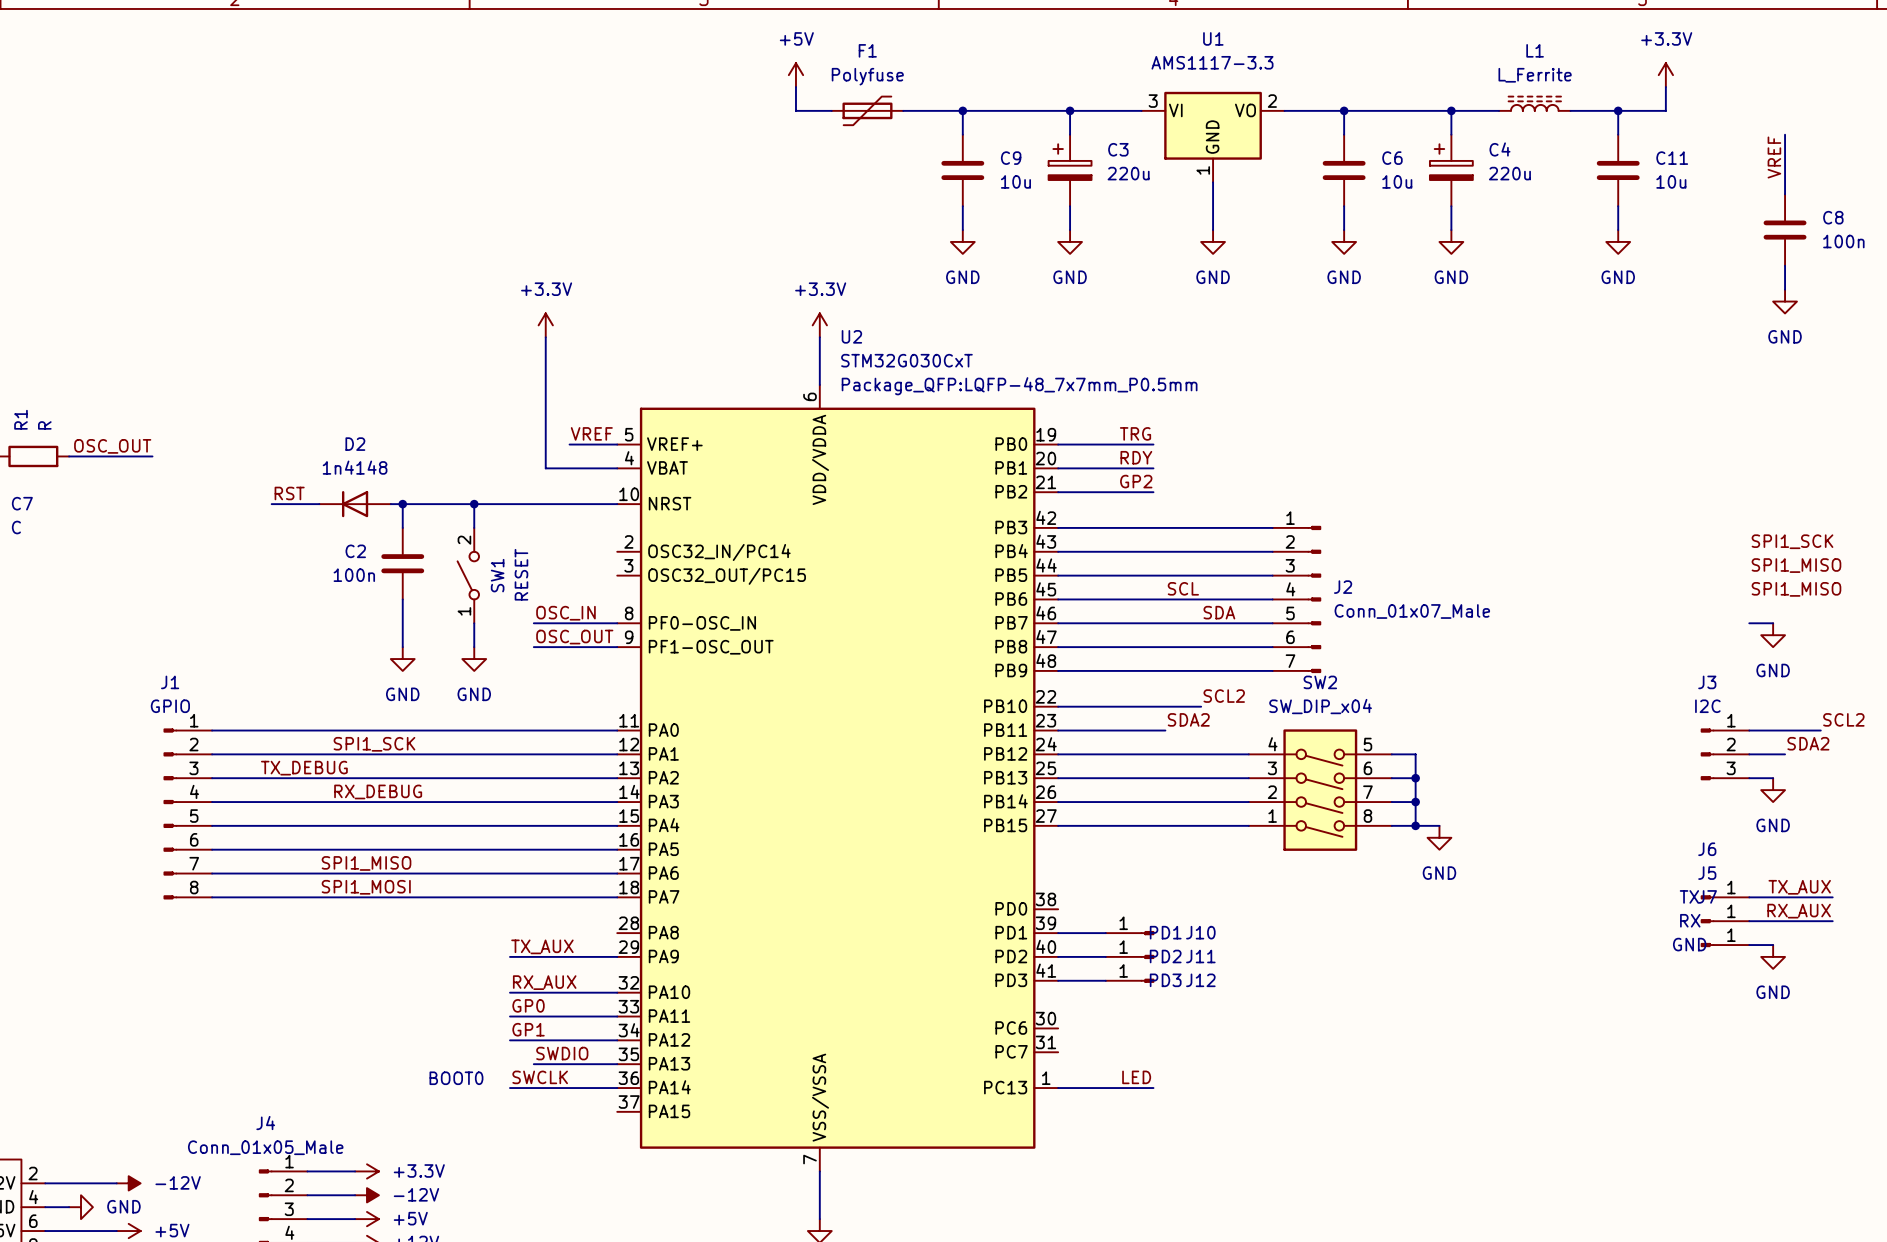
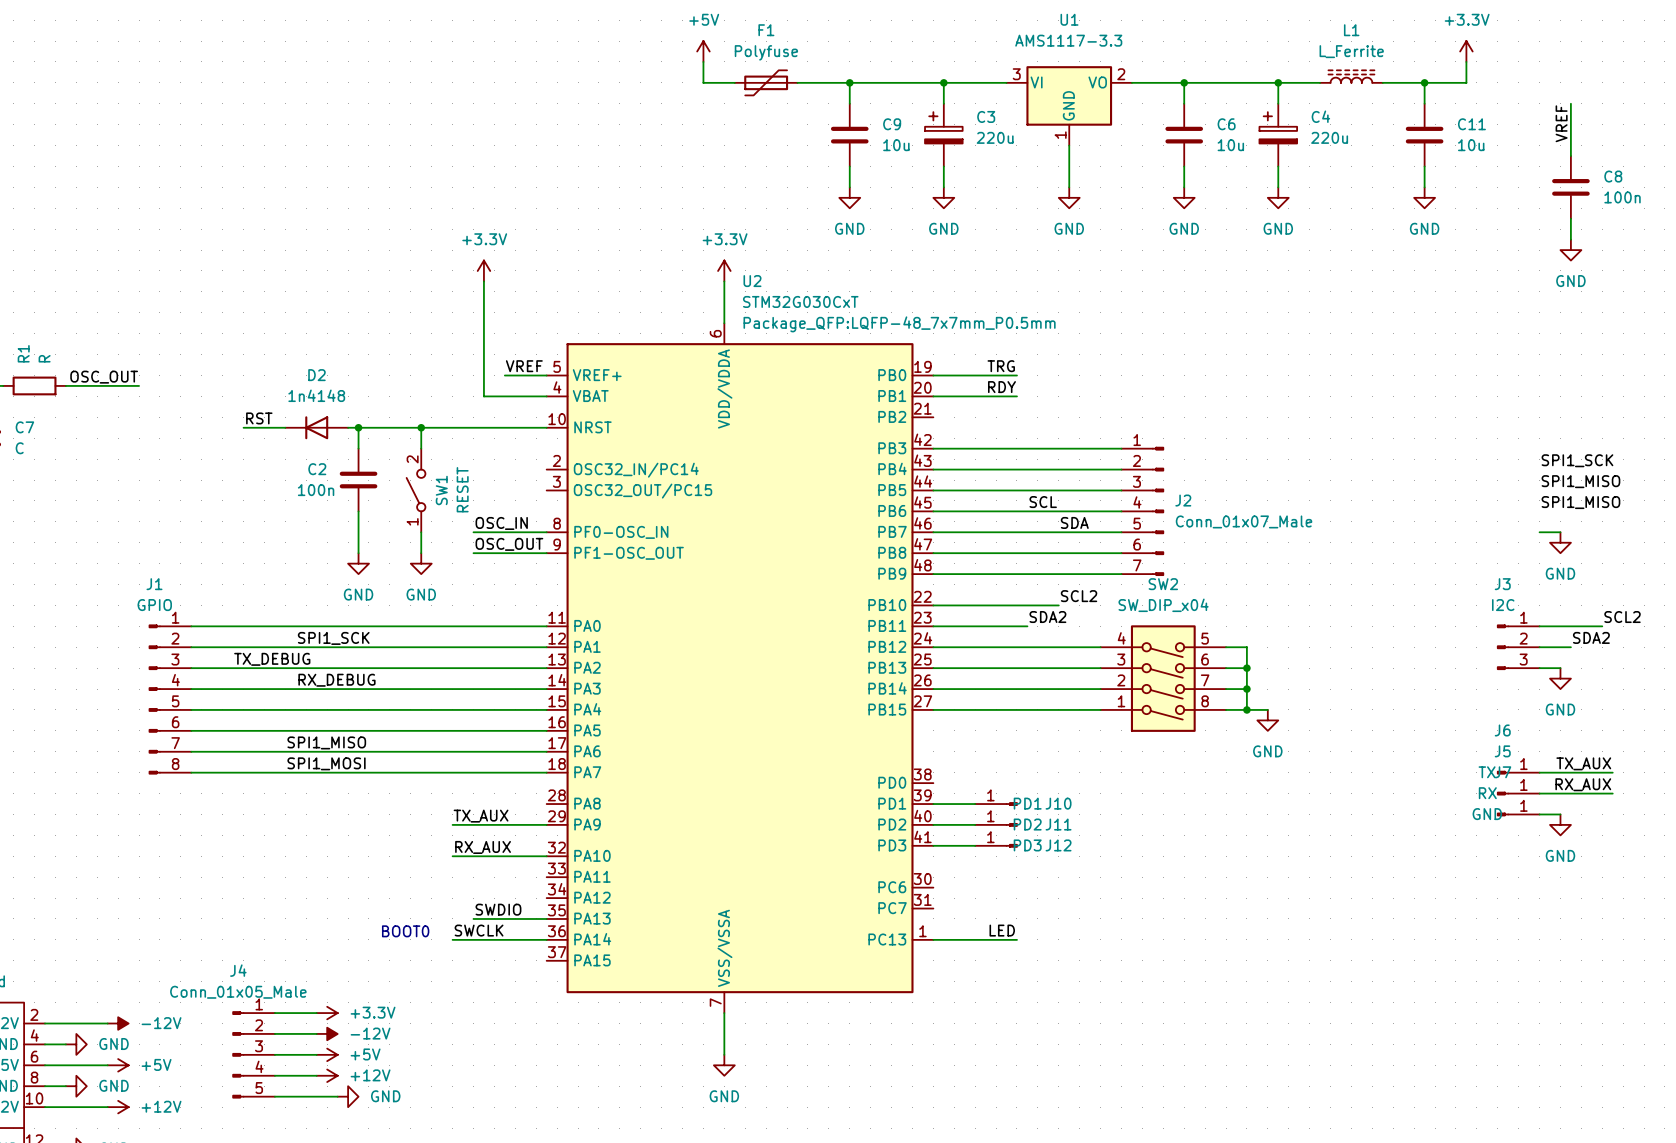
label: GP2 (1136, 481) -> none
wire: (1058, 492) (1153, 492) -> none
label: GP0 (528, 1005) -> none
wire: (509, 1016) (617, 1016) -> none
label: GP1 (528, 1029) -> none
wire: (509, 1040) (617, 1040) -> none

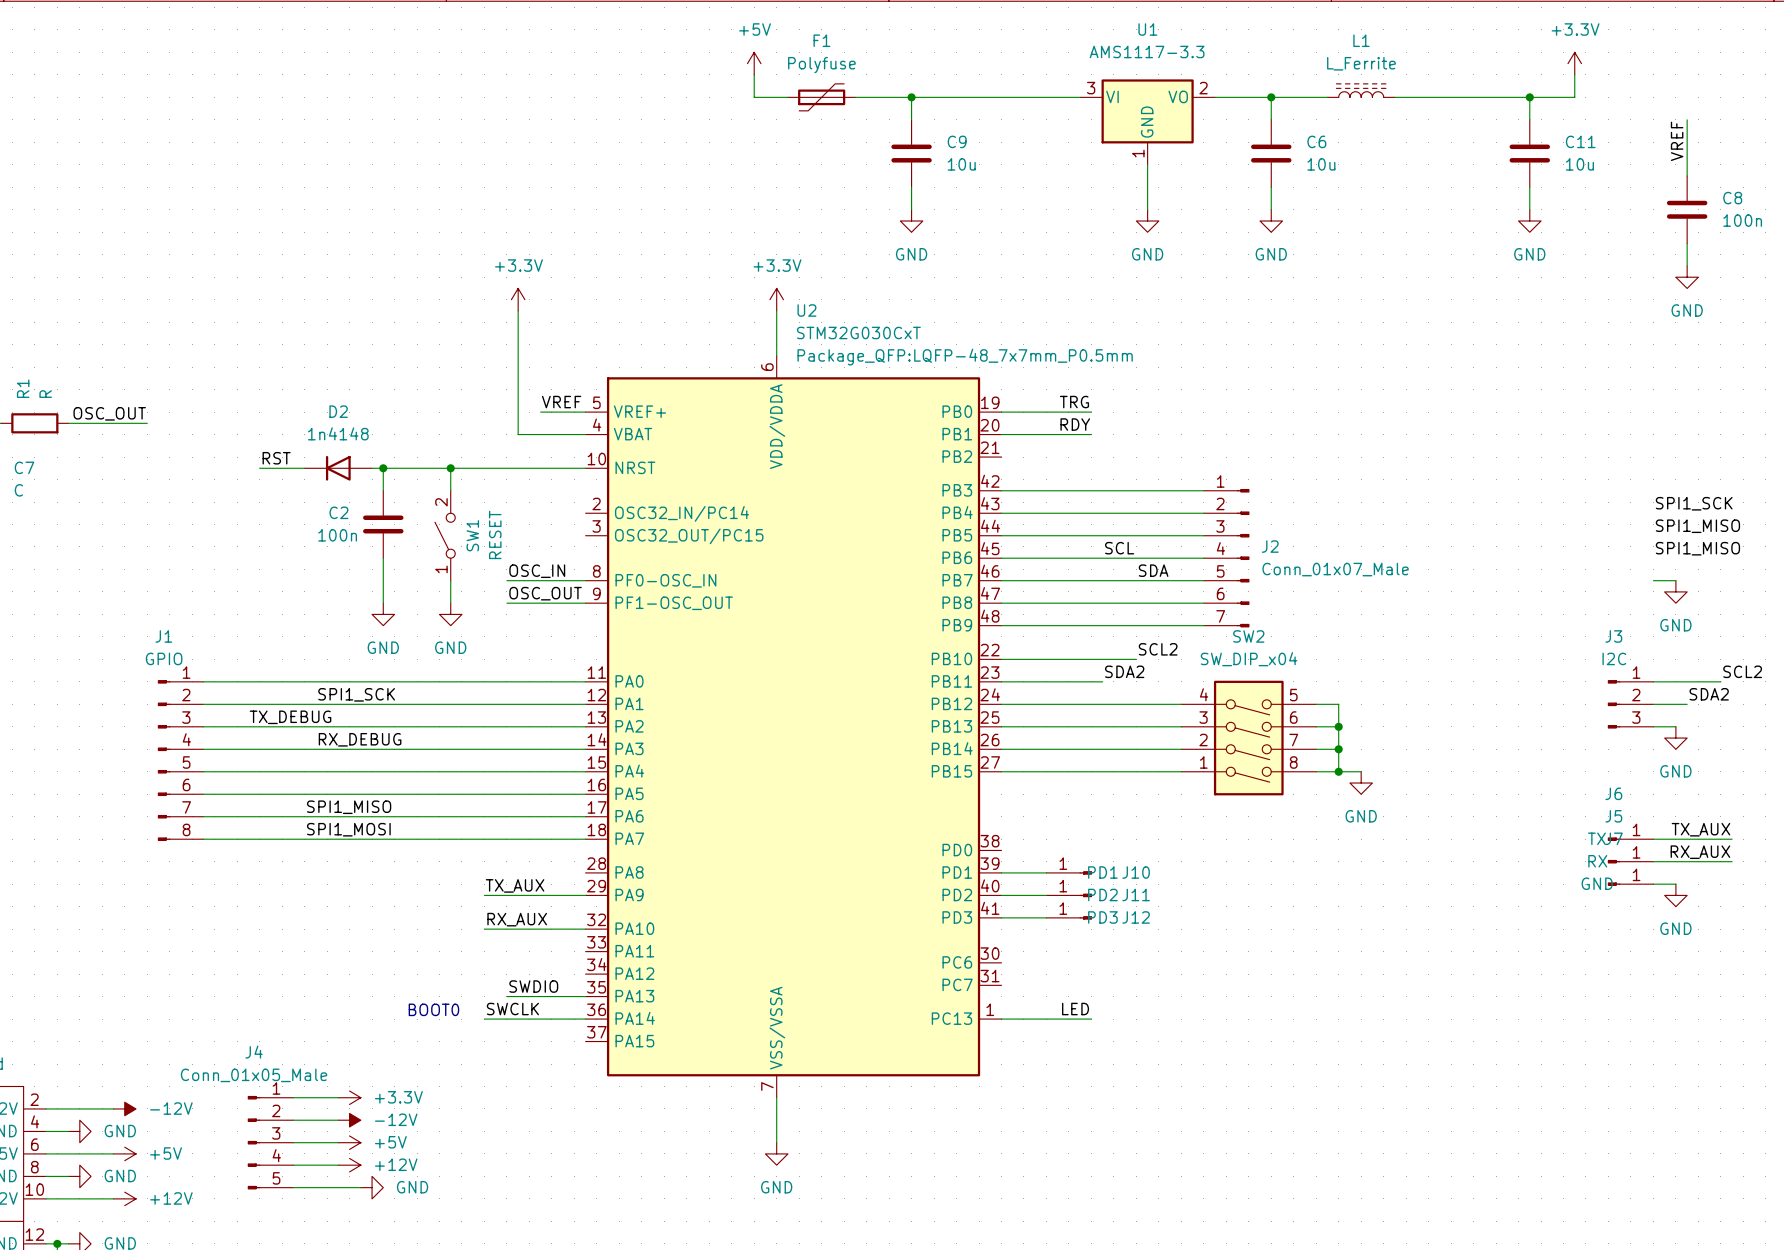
L1 position: (1351, 76) -> (1361, 90)
wire: (943, 82) (943, 103) -> none
junction: (943, 82) -> none
wire: (1236, 82) (1299, 82) -> (1417, 97) (1484, 97)
wire: (1278, 82) (1278, 103) -> none
junction: (1278, 82) -> none
C3: 220u (943, 135) -> none
C4: 220u (1278, 135) -> none
wire: (943, 166) (943, 187) -> none
wire: (1278, 166) (1278, 187) -> none
power symbol: GND (943, 197) -> none
power symbol: GND (1278, 197) -> none

